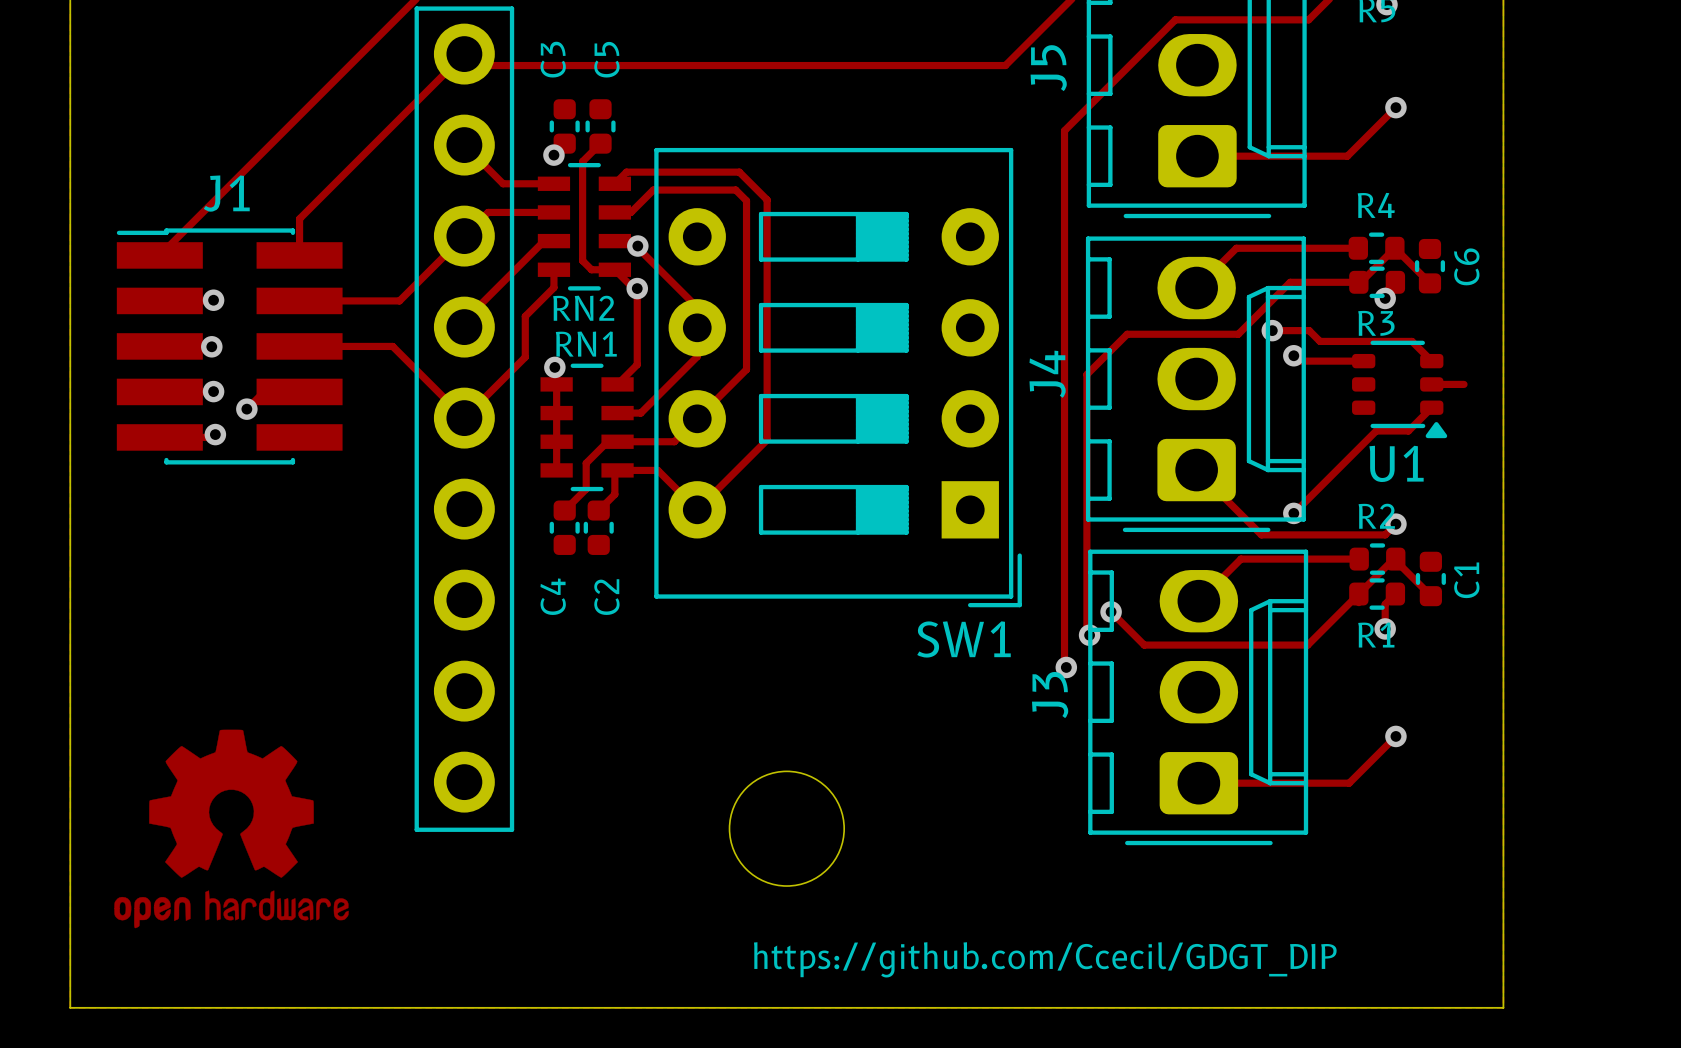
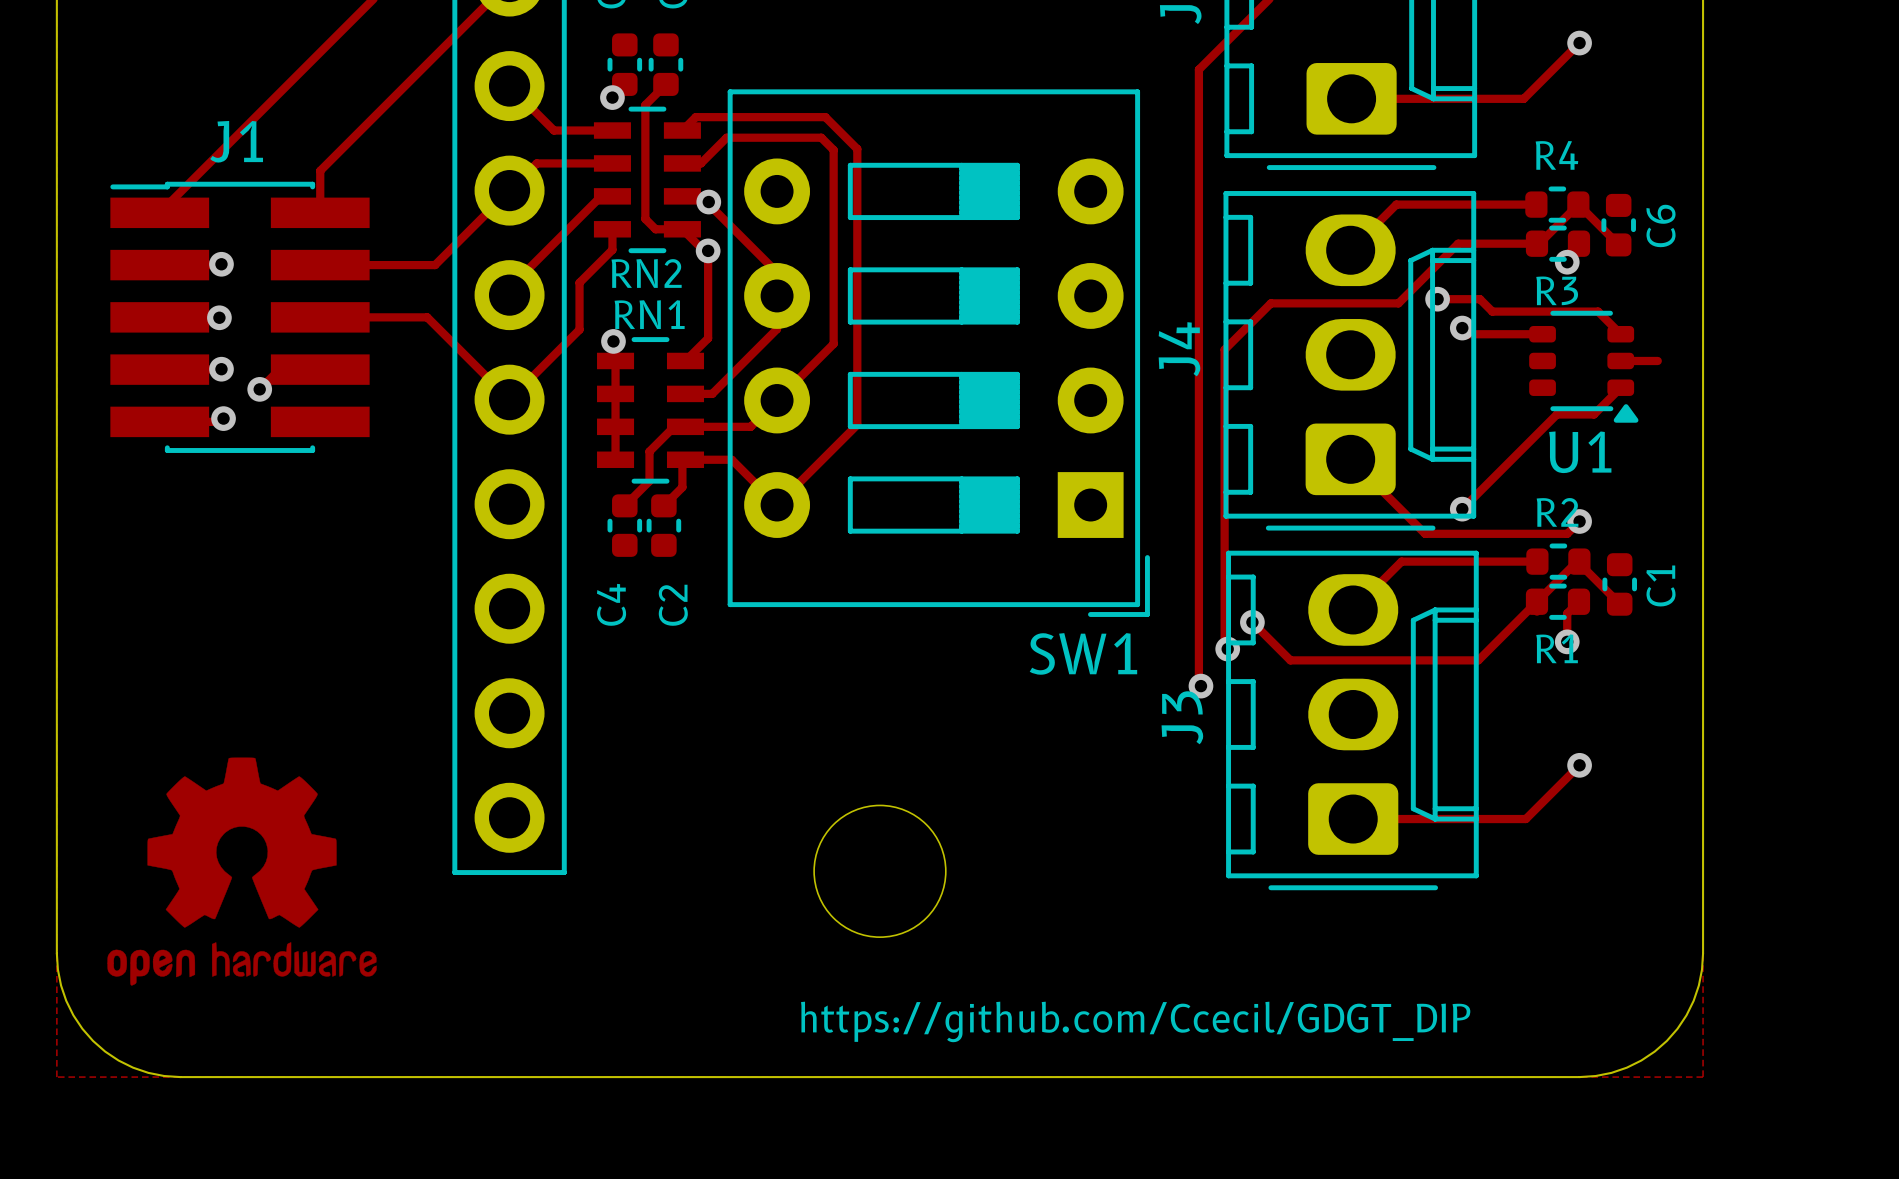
board edge: (70, 900) (70, 1007) (177, 1007) -> (56, 953) (57, 969) (66, 1000) (73, 1015) (93, 1040) (105, 1051) (133, 1067) (164, 1076) (180, 1077)
board edge: (1503, 900) (1503, 1007) (1395, 1007) -> (1703, 953) (1698, 985) (1693, 1000) (1677, 1028) (1666, 1040) (1654, 1051) (1626, 1067) (1611, 1072) (1579, 1077)
text position: https://github.com/Ccecil/GDGT_DIP (1045, 959) -> https://github.com/Ccecil/GDGT_DIP (1135, 1021)

